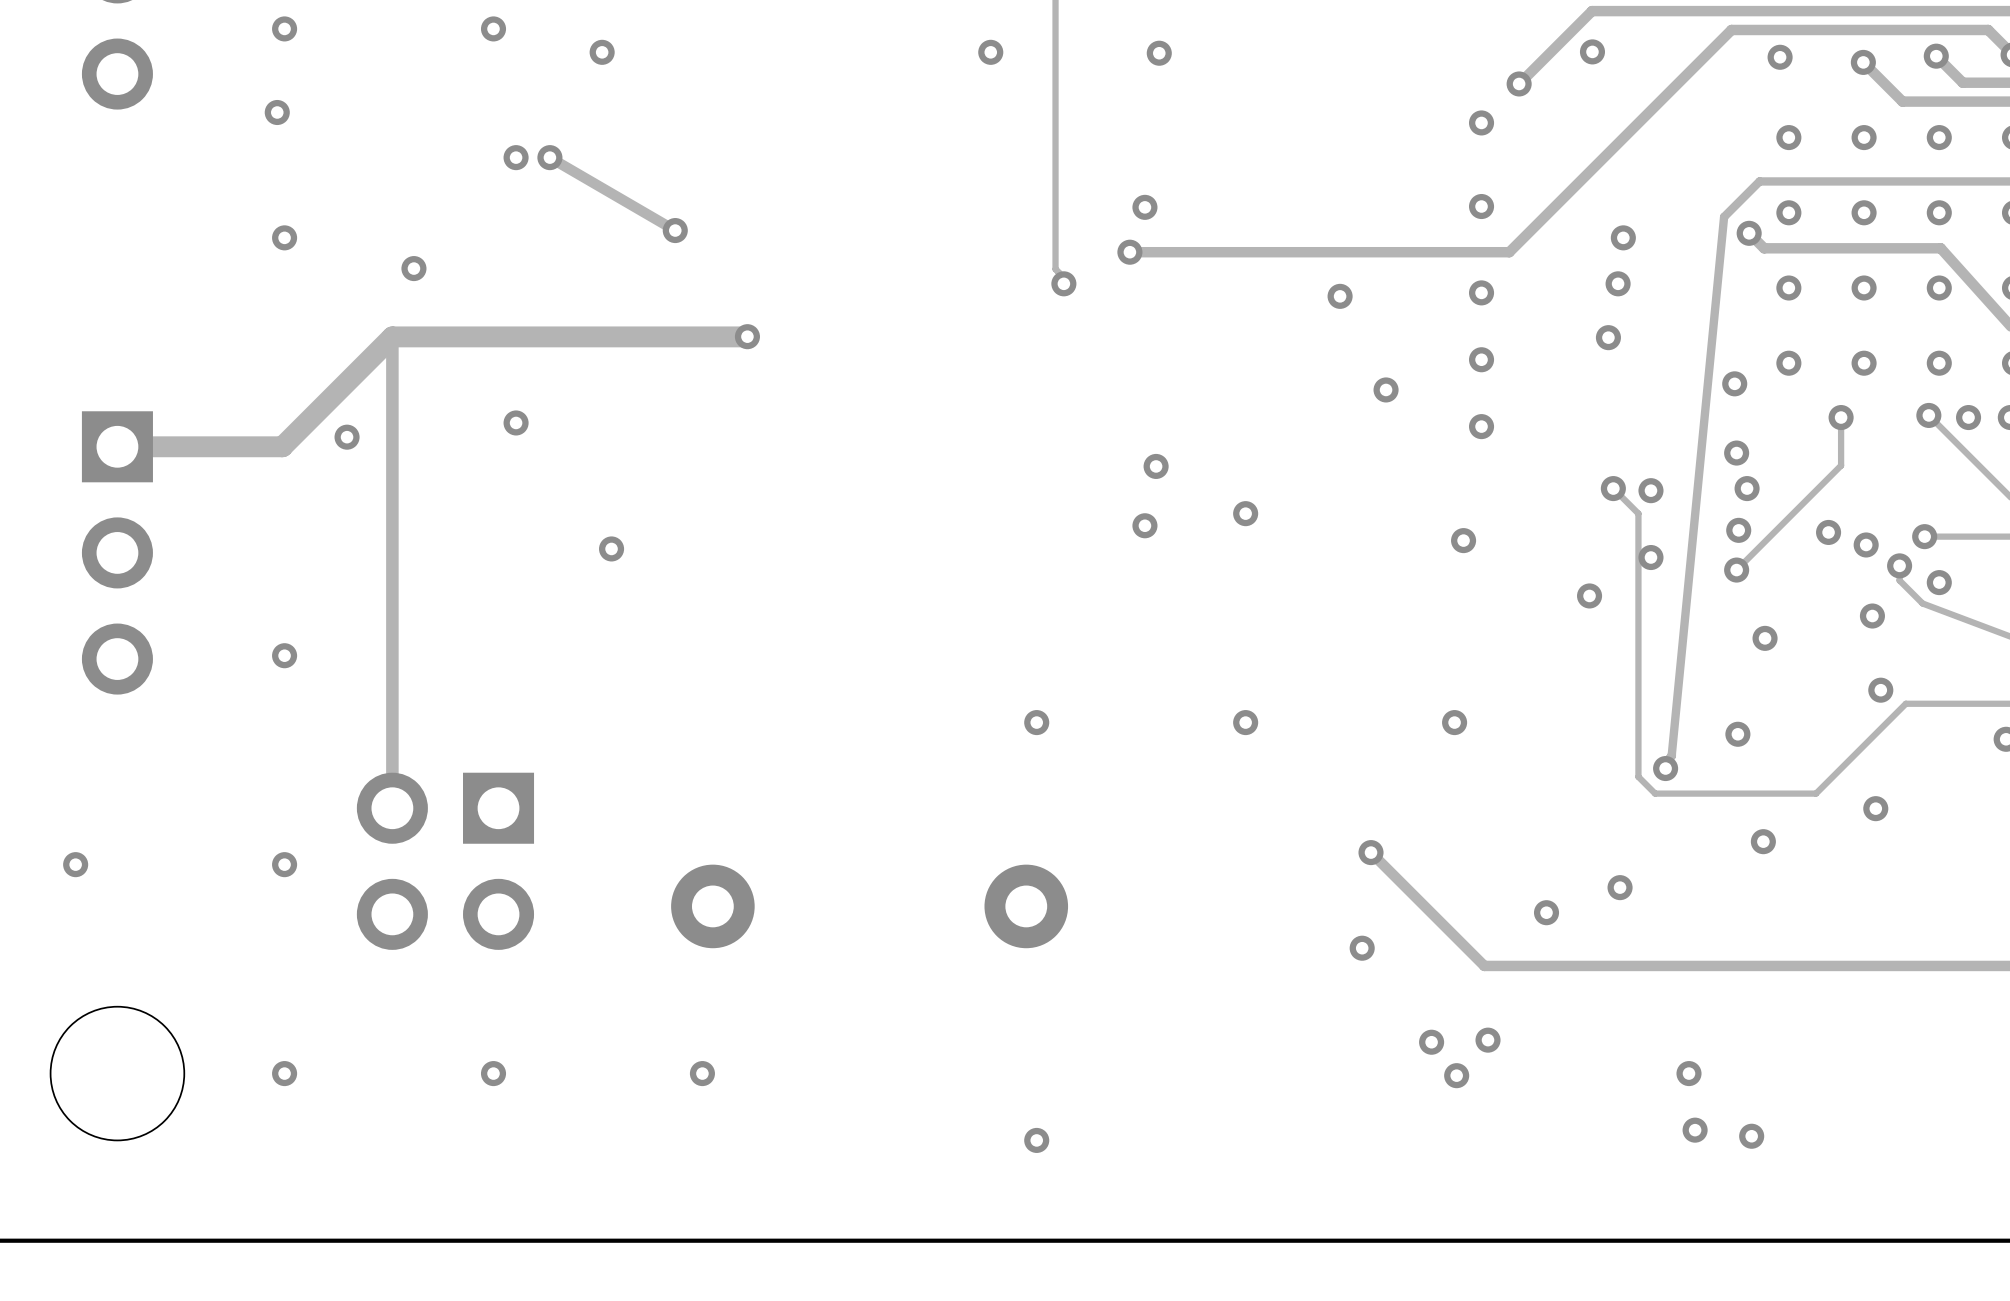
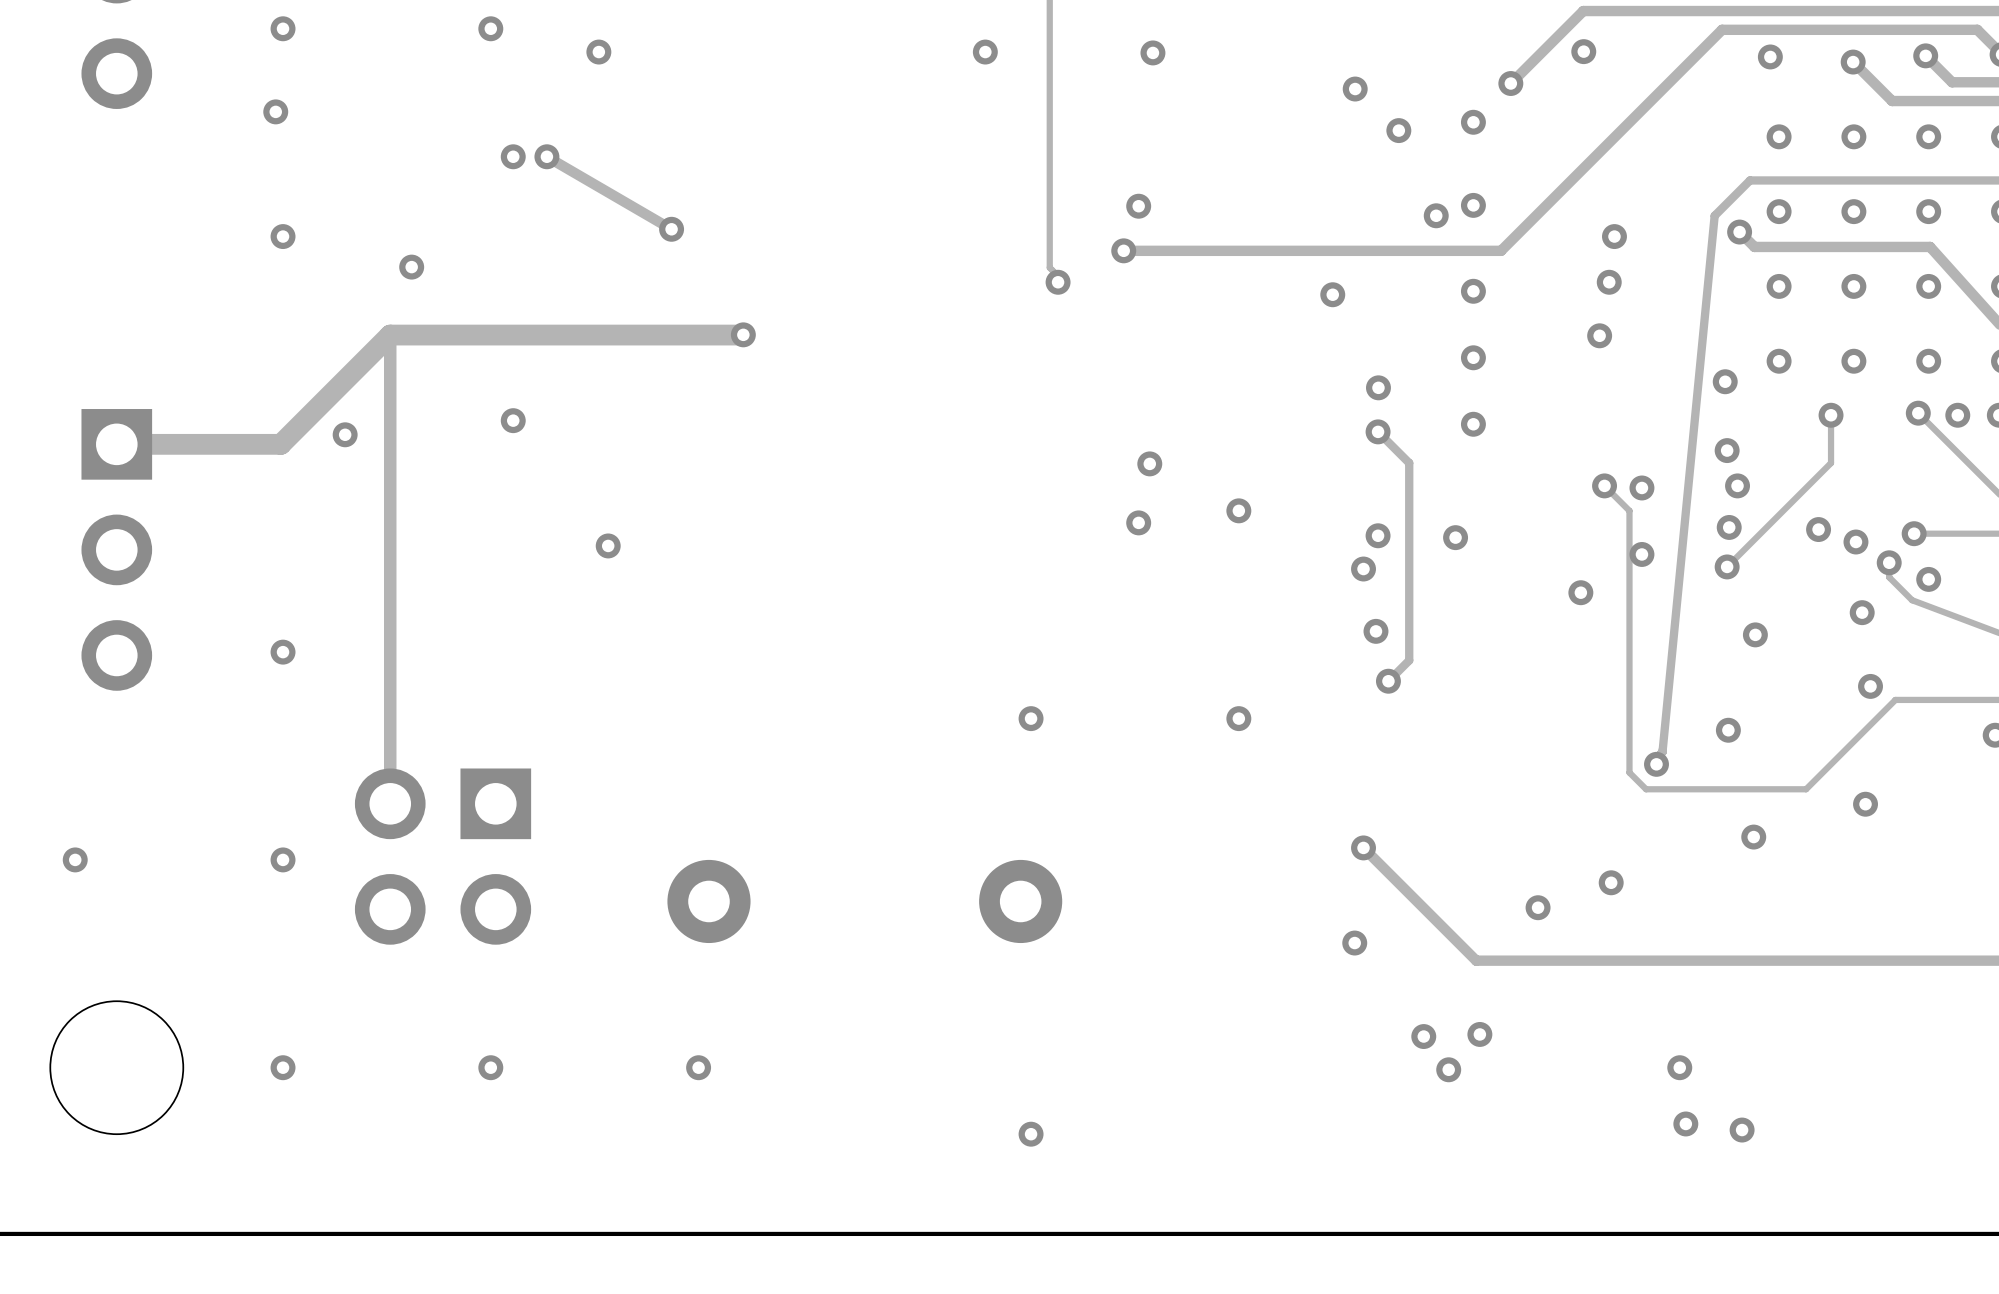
via: none -> (1355, 89)
via: none -> (1398, 130)
via: none -> (1436, 215)
track: none -> (1378, 431) (1409, 463) (1409, 660) (1388, 681)
via: none -> (1378, 431)
via: none -> (1378, 535)
via: none -> (1363, 569)
via: none -> (1375, 631)
via: none -> (1388, 681)
via: (1454, 722) -> none

